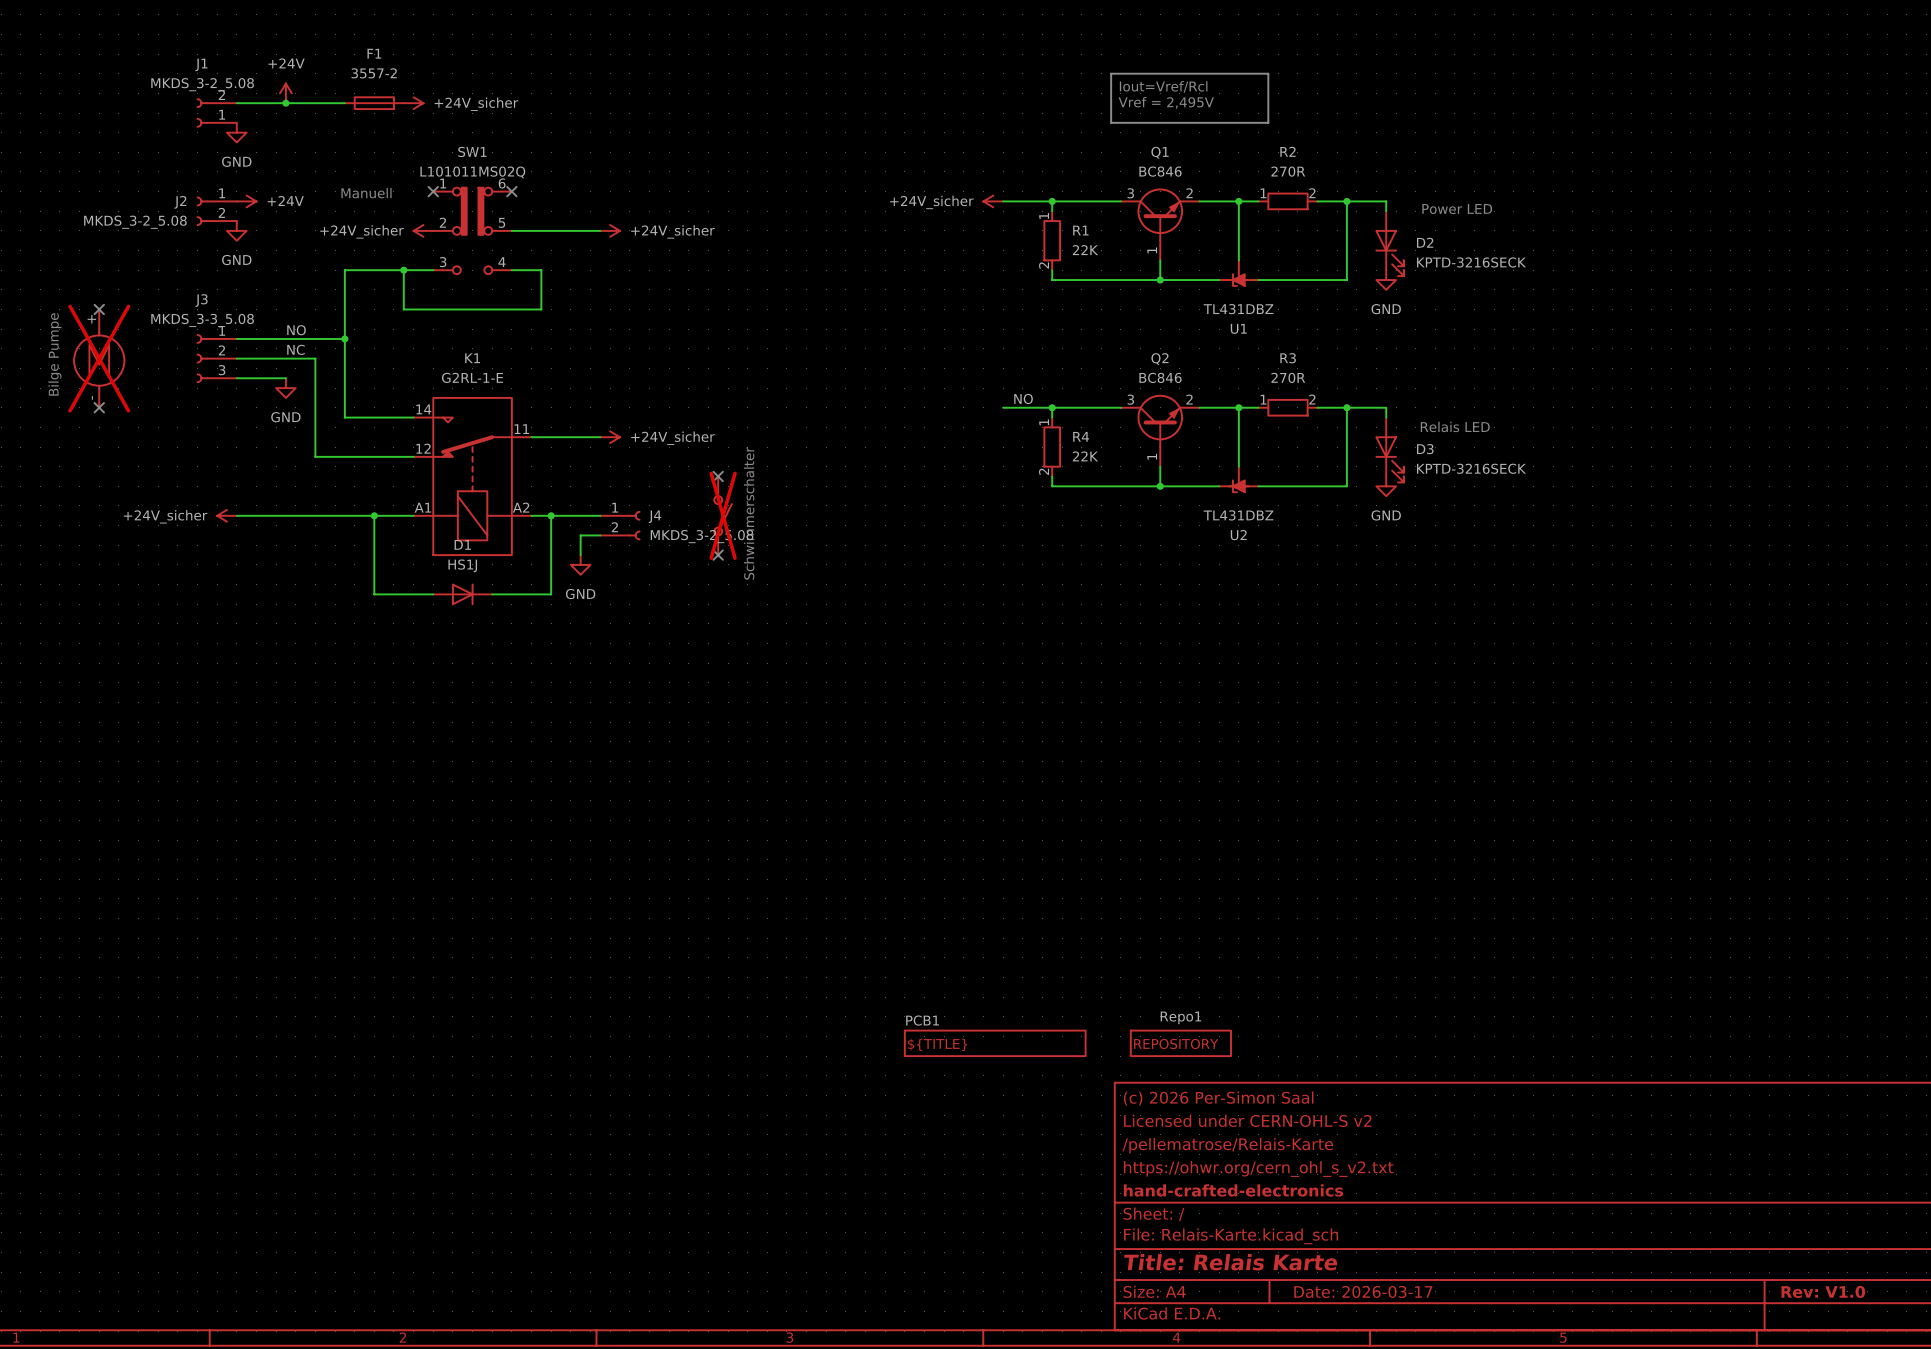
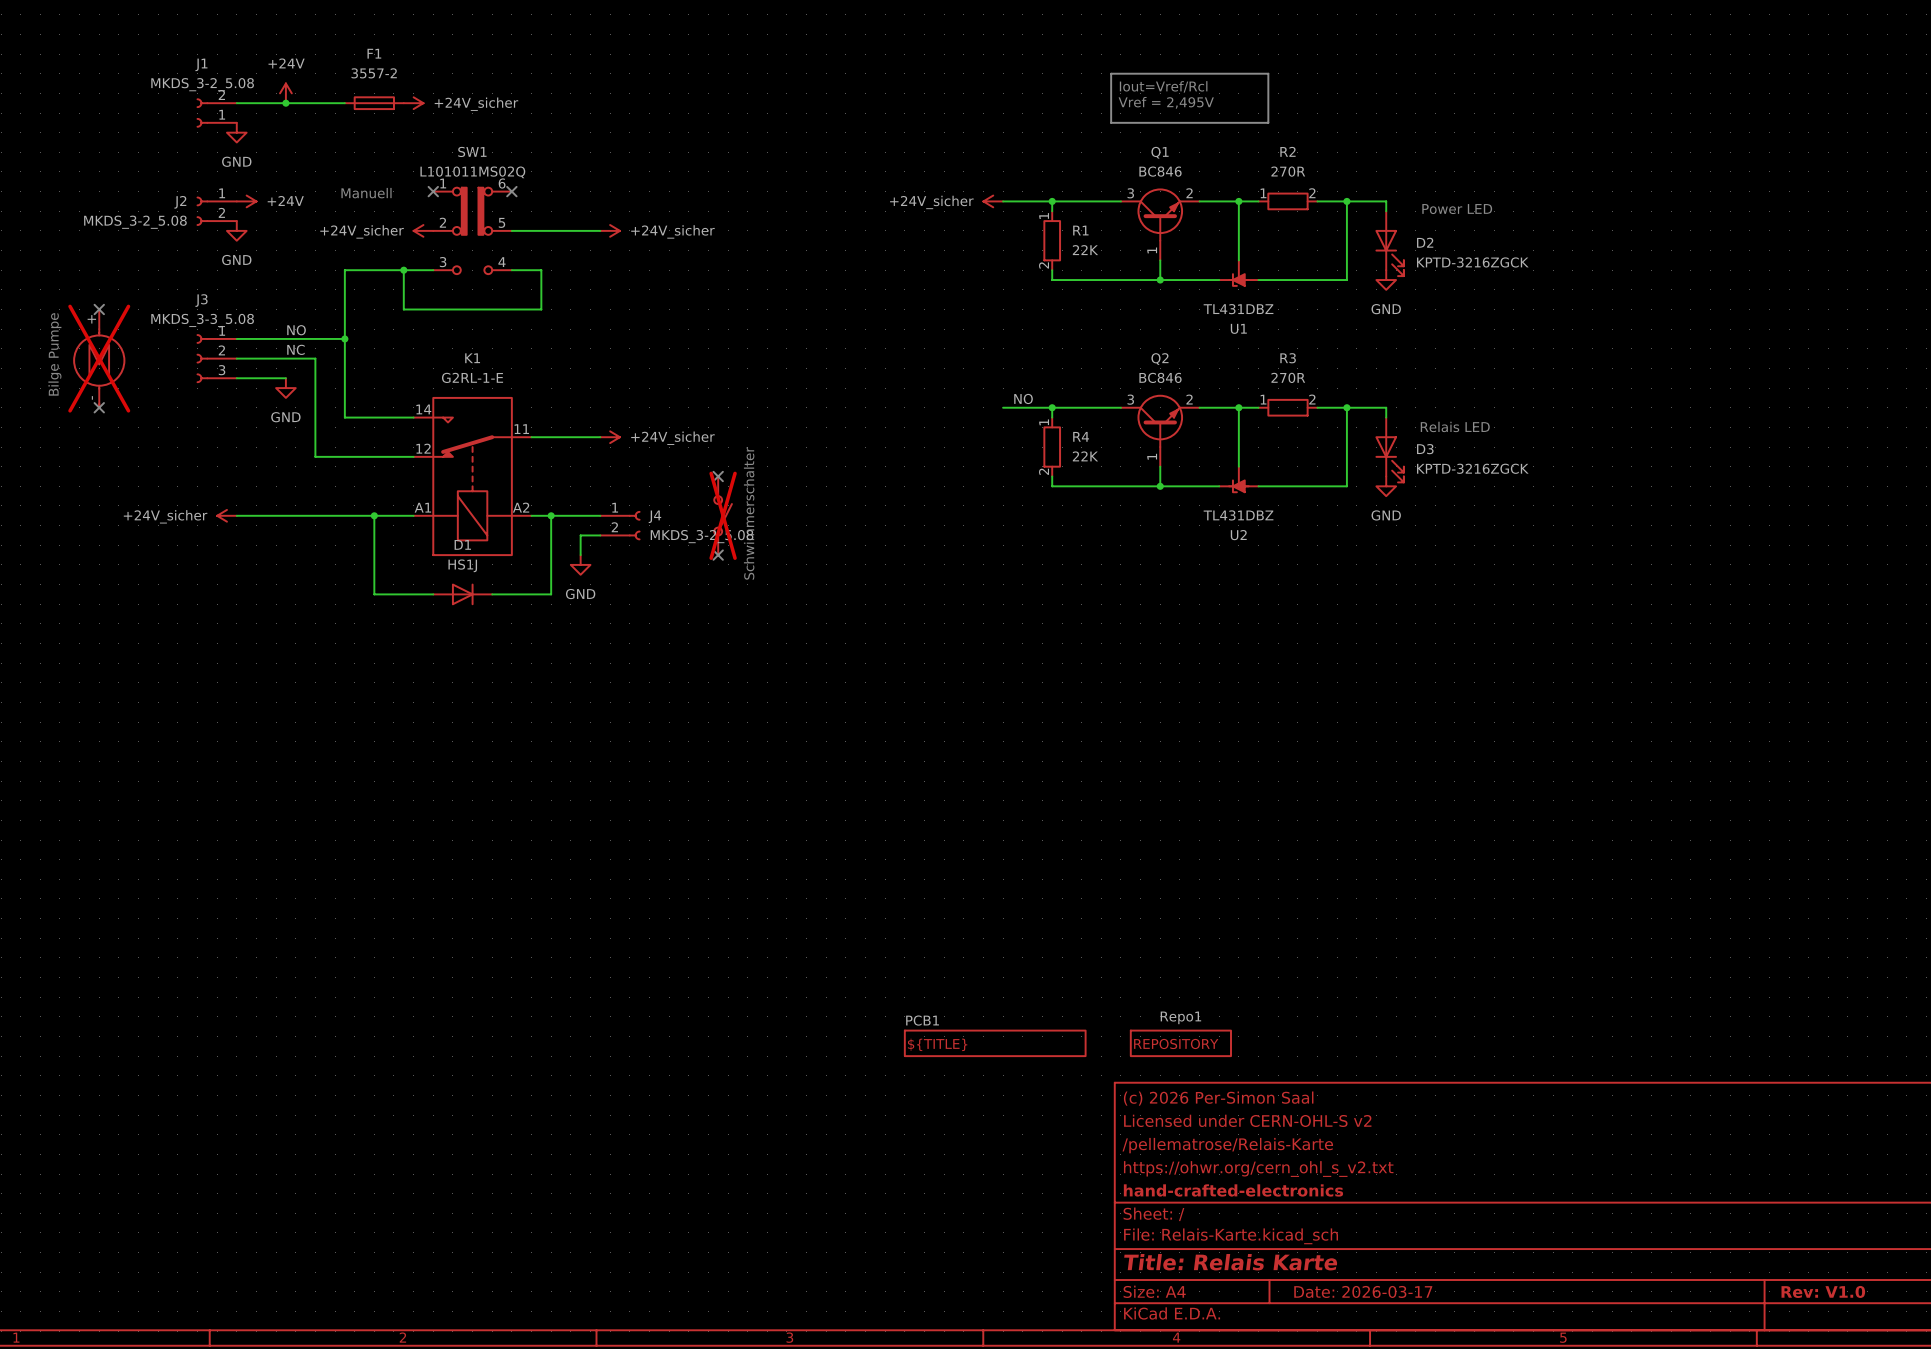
D2 value: KPTD-3216SECK (1471, 262) -> KPTD-3216ZGCK (1472, 262)
D3 value: KPTD-3216SECK (1471, 468) -> KPTD-3216ZGCK (1472, 468)

